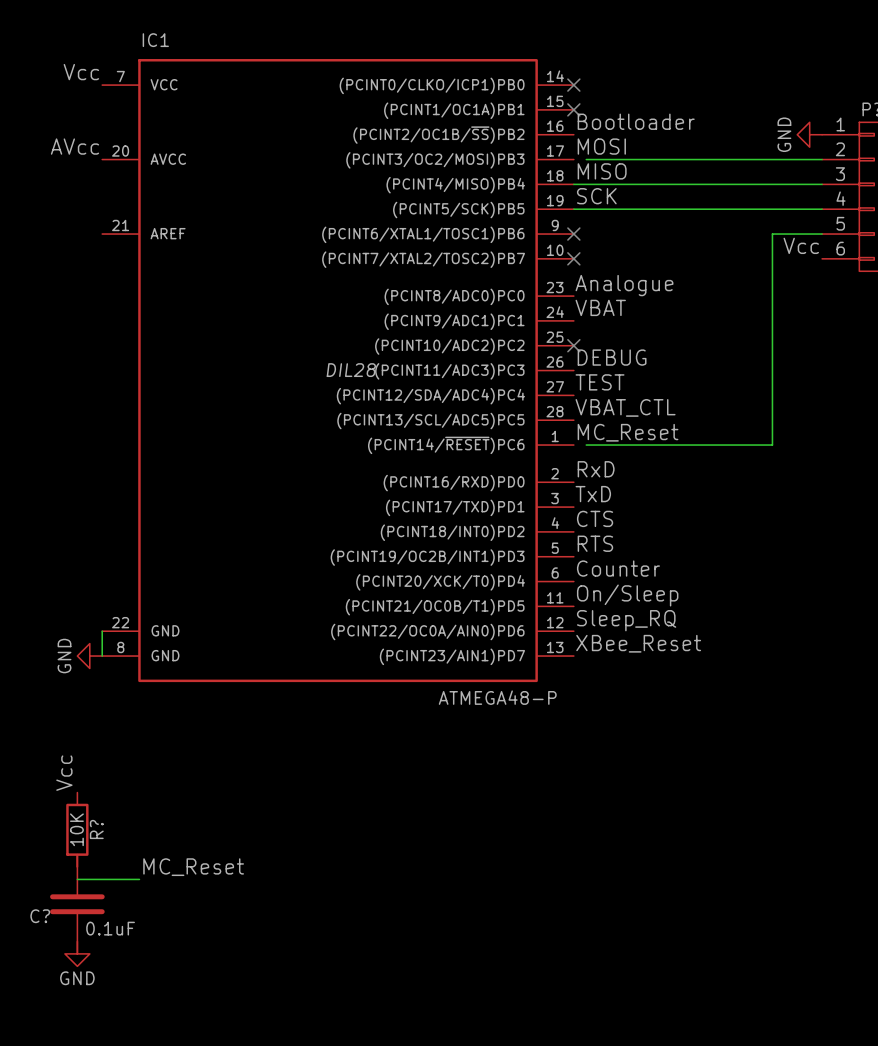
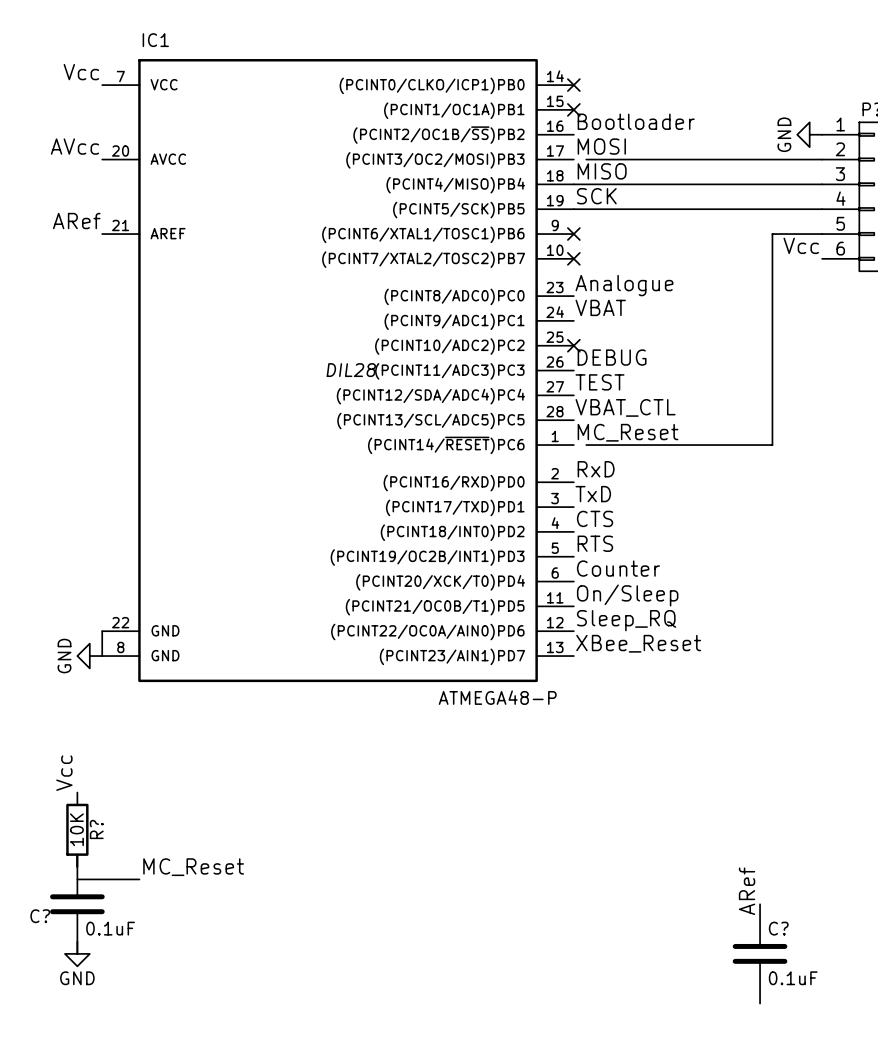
label: none -> ARef (76, 221)
label: none -> ARef (747, 891)
C?: none -> 0.1uF (760, 953)

